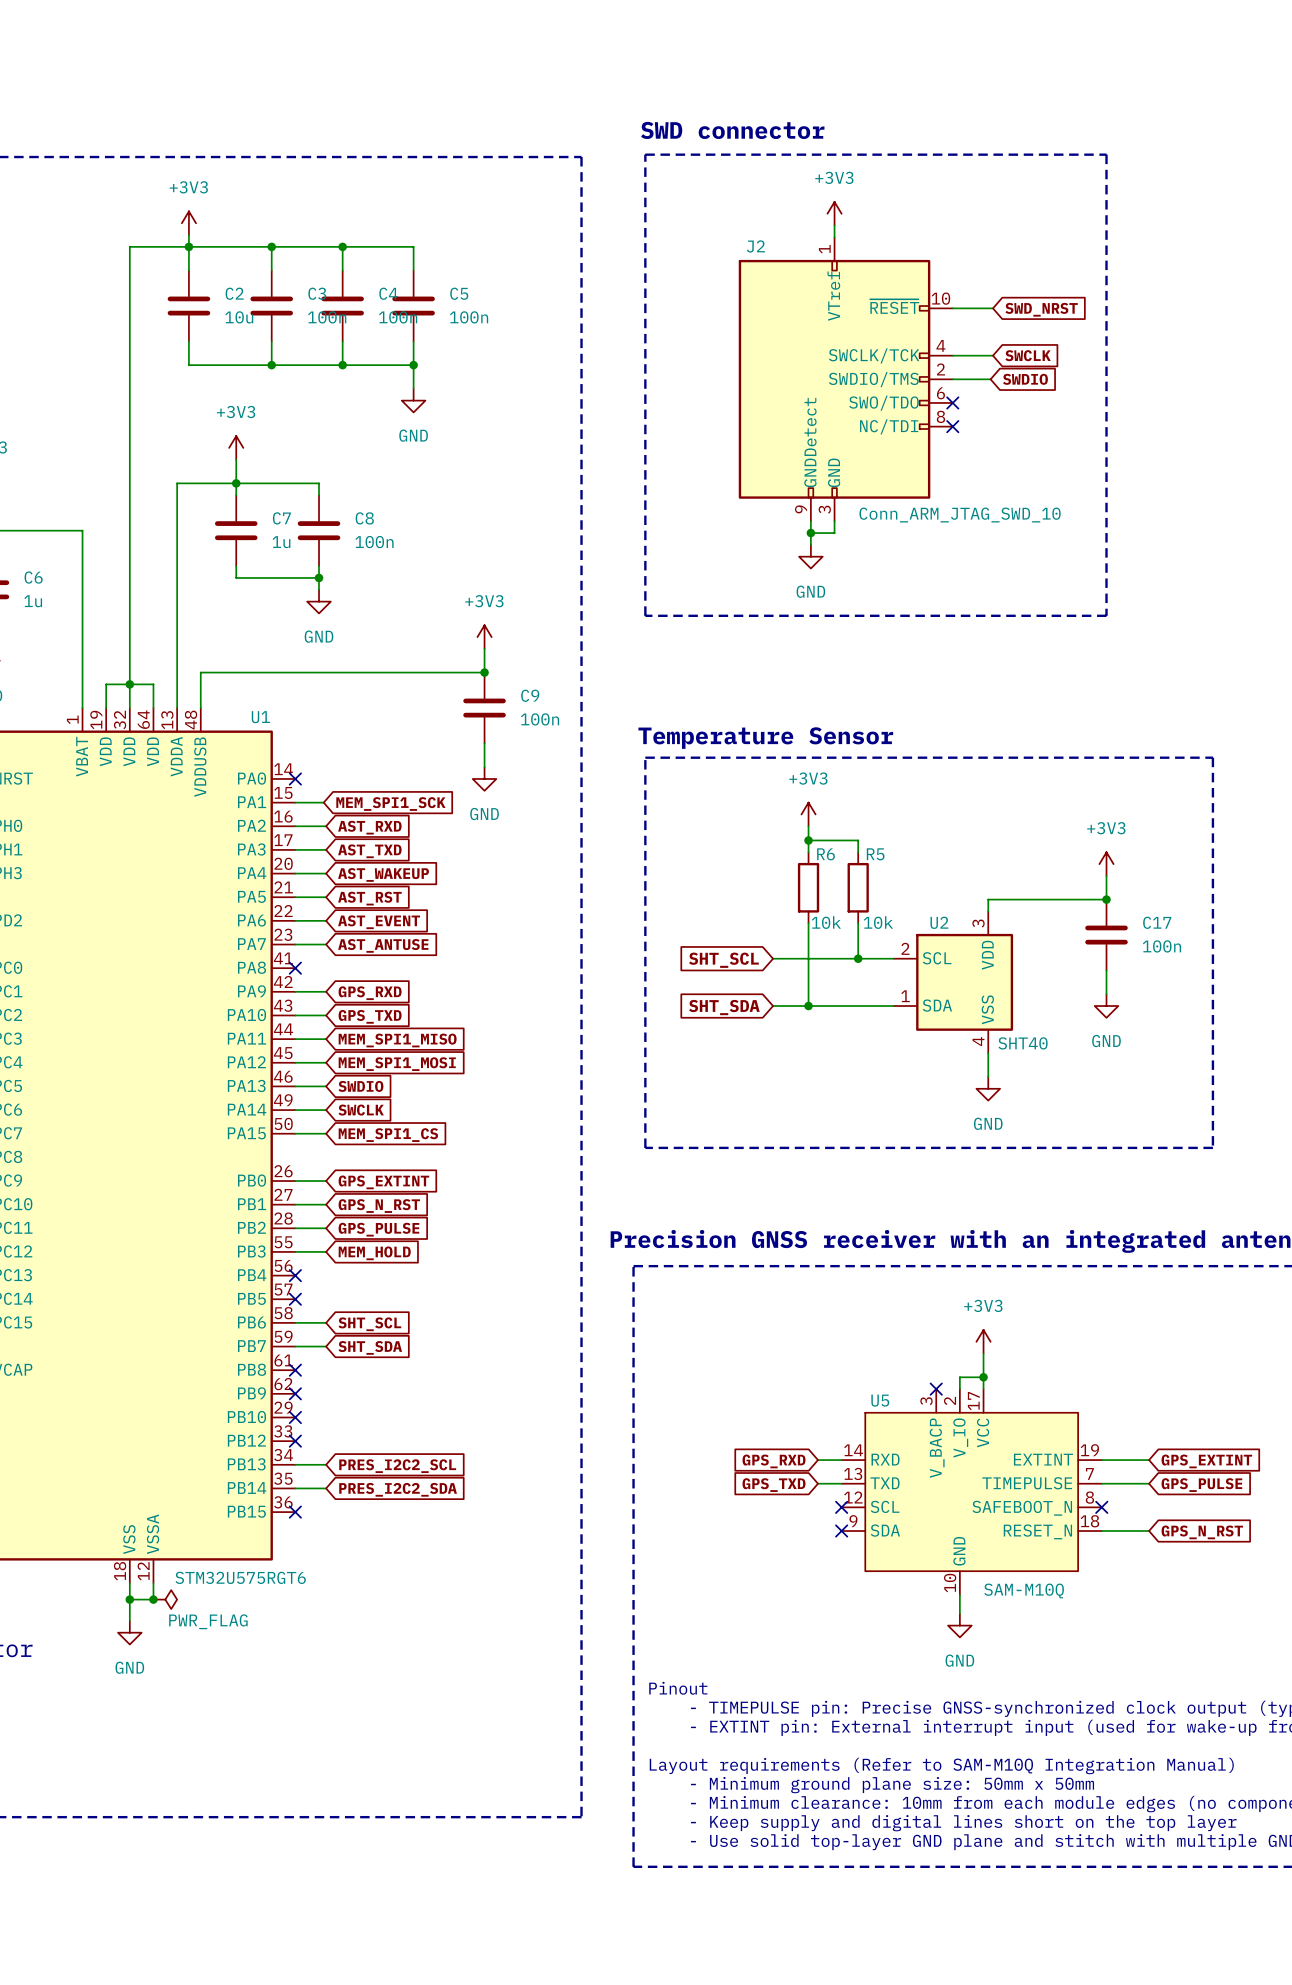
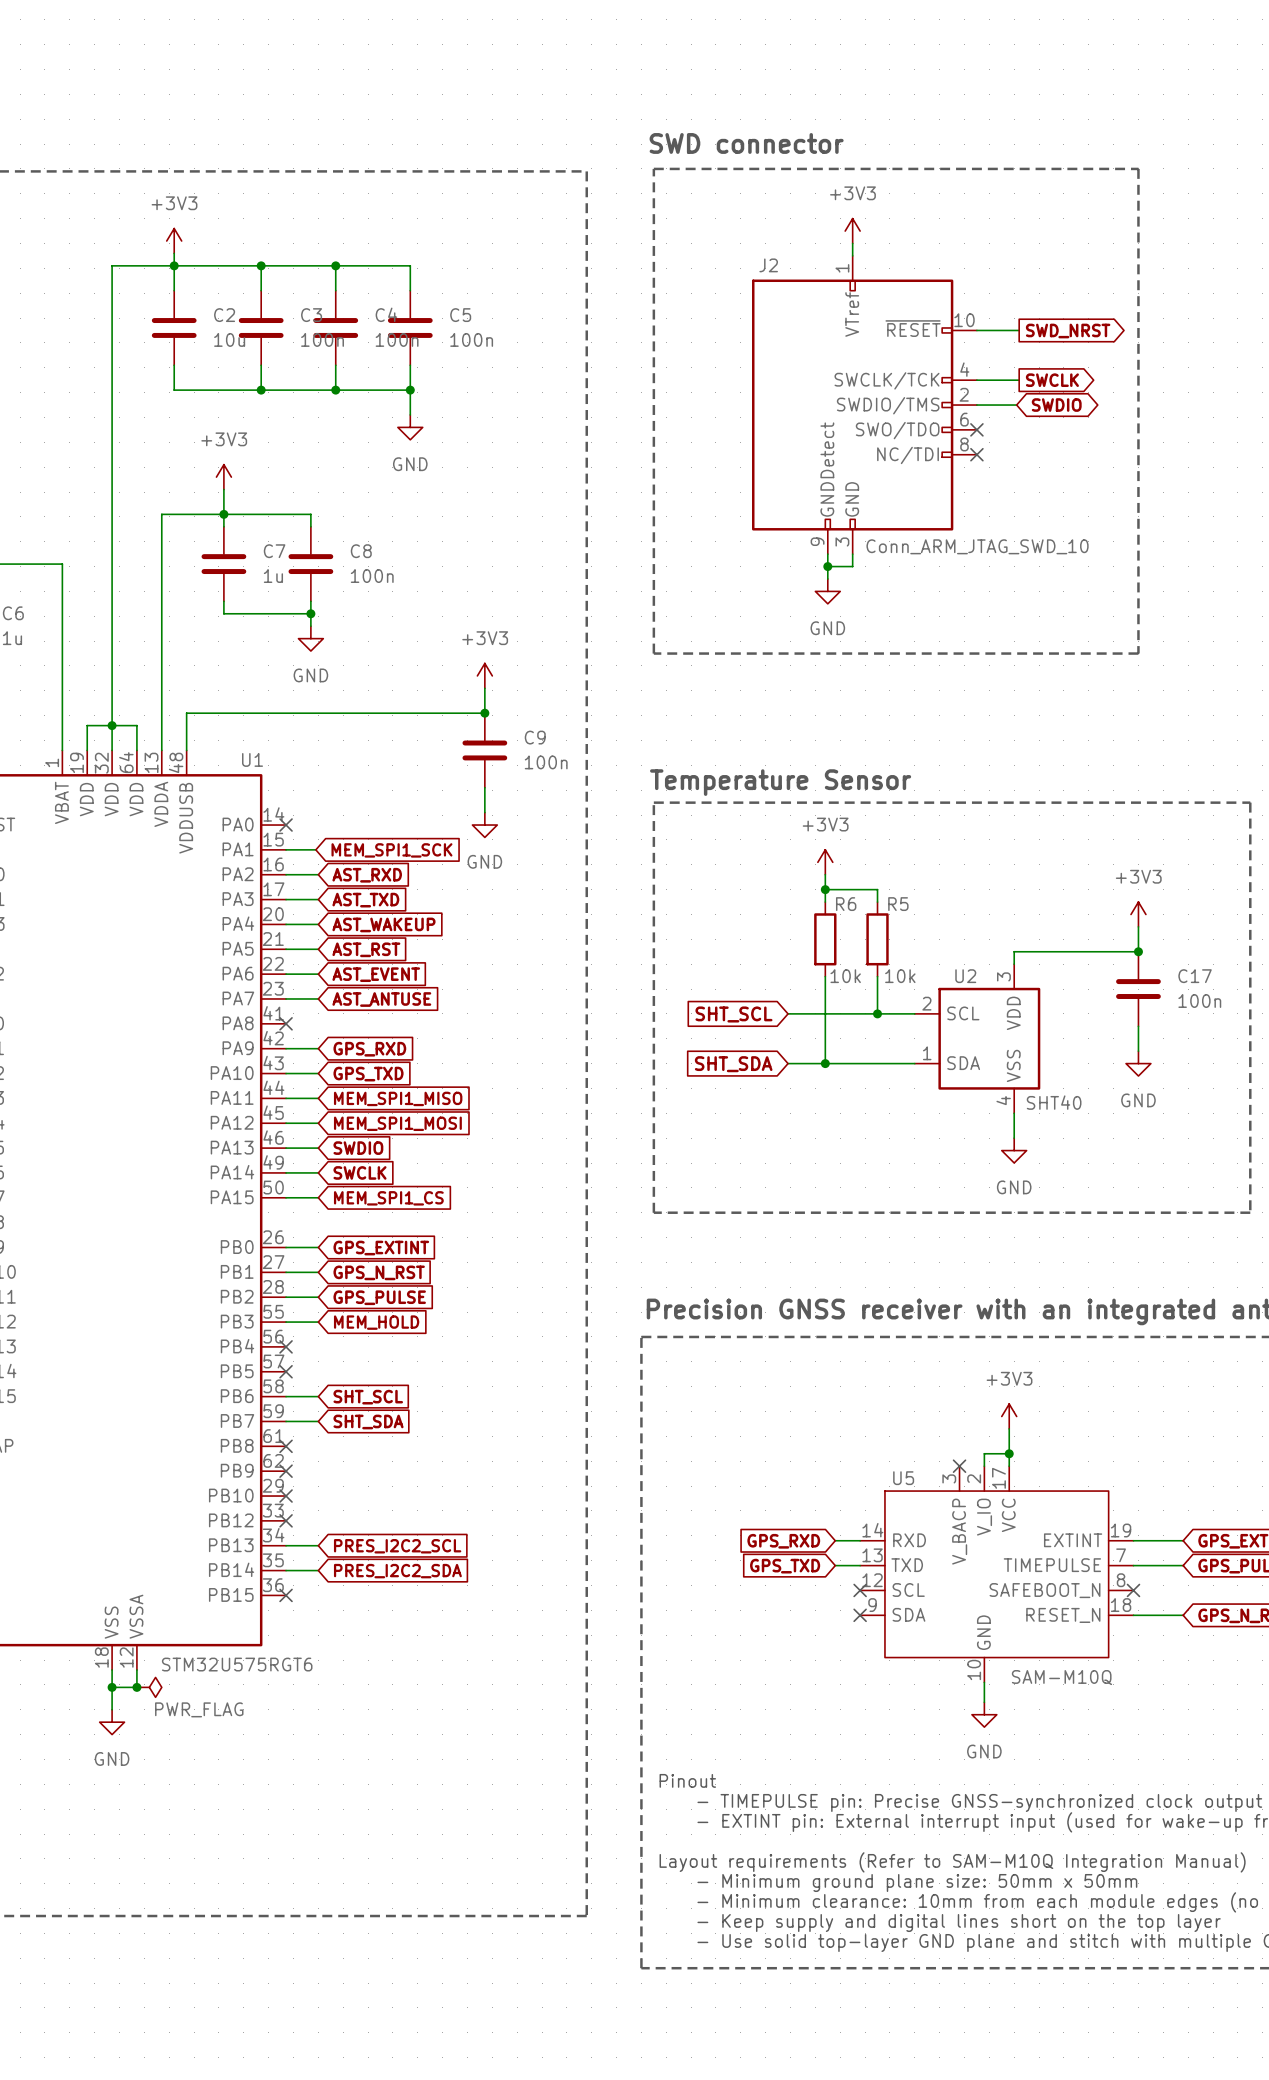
global label shape: input (1041, 309) -> output (1068, 331)
global label shape: input (1028, 355) -> output (1052, 380)
global label shape: input (1025, 379) -> bidirectional (1056, 405)

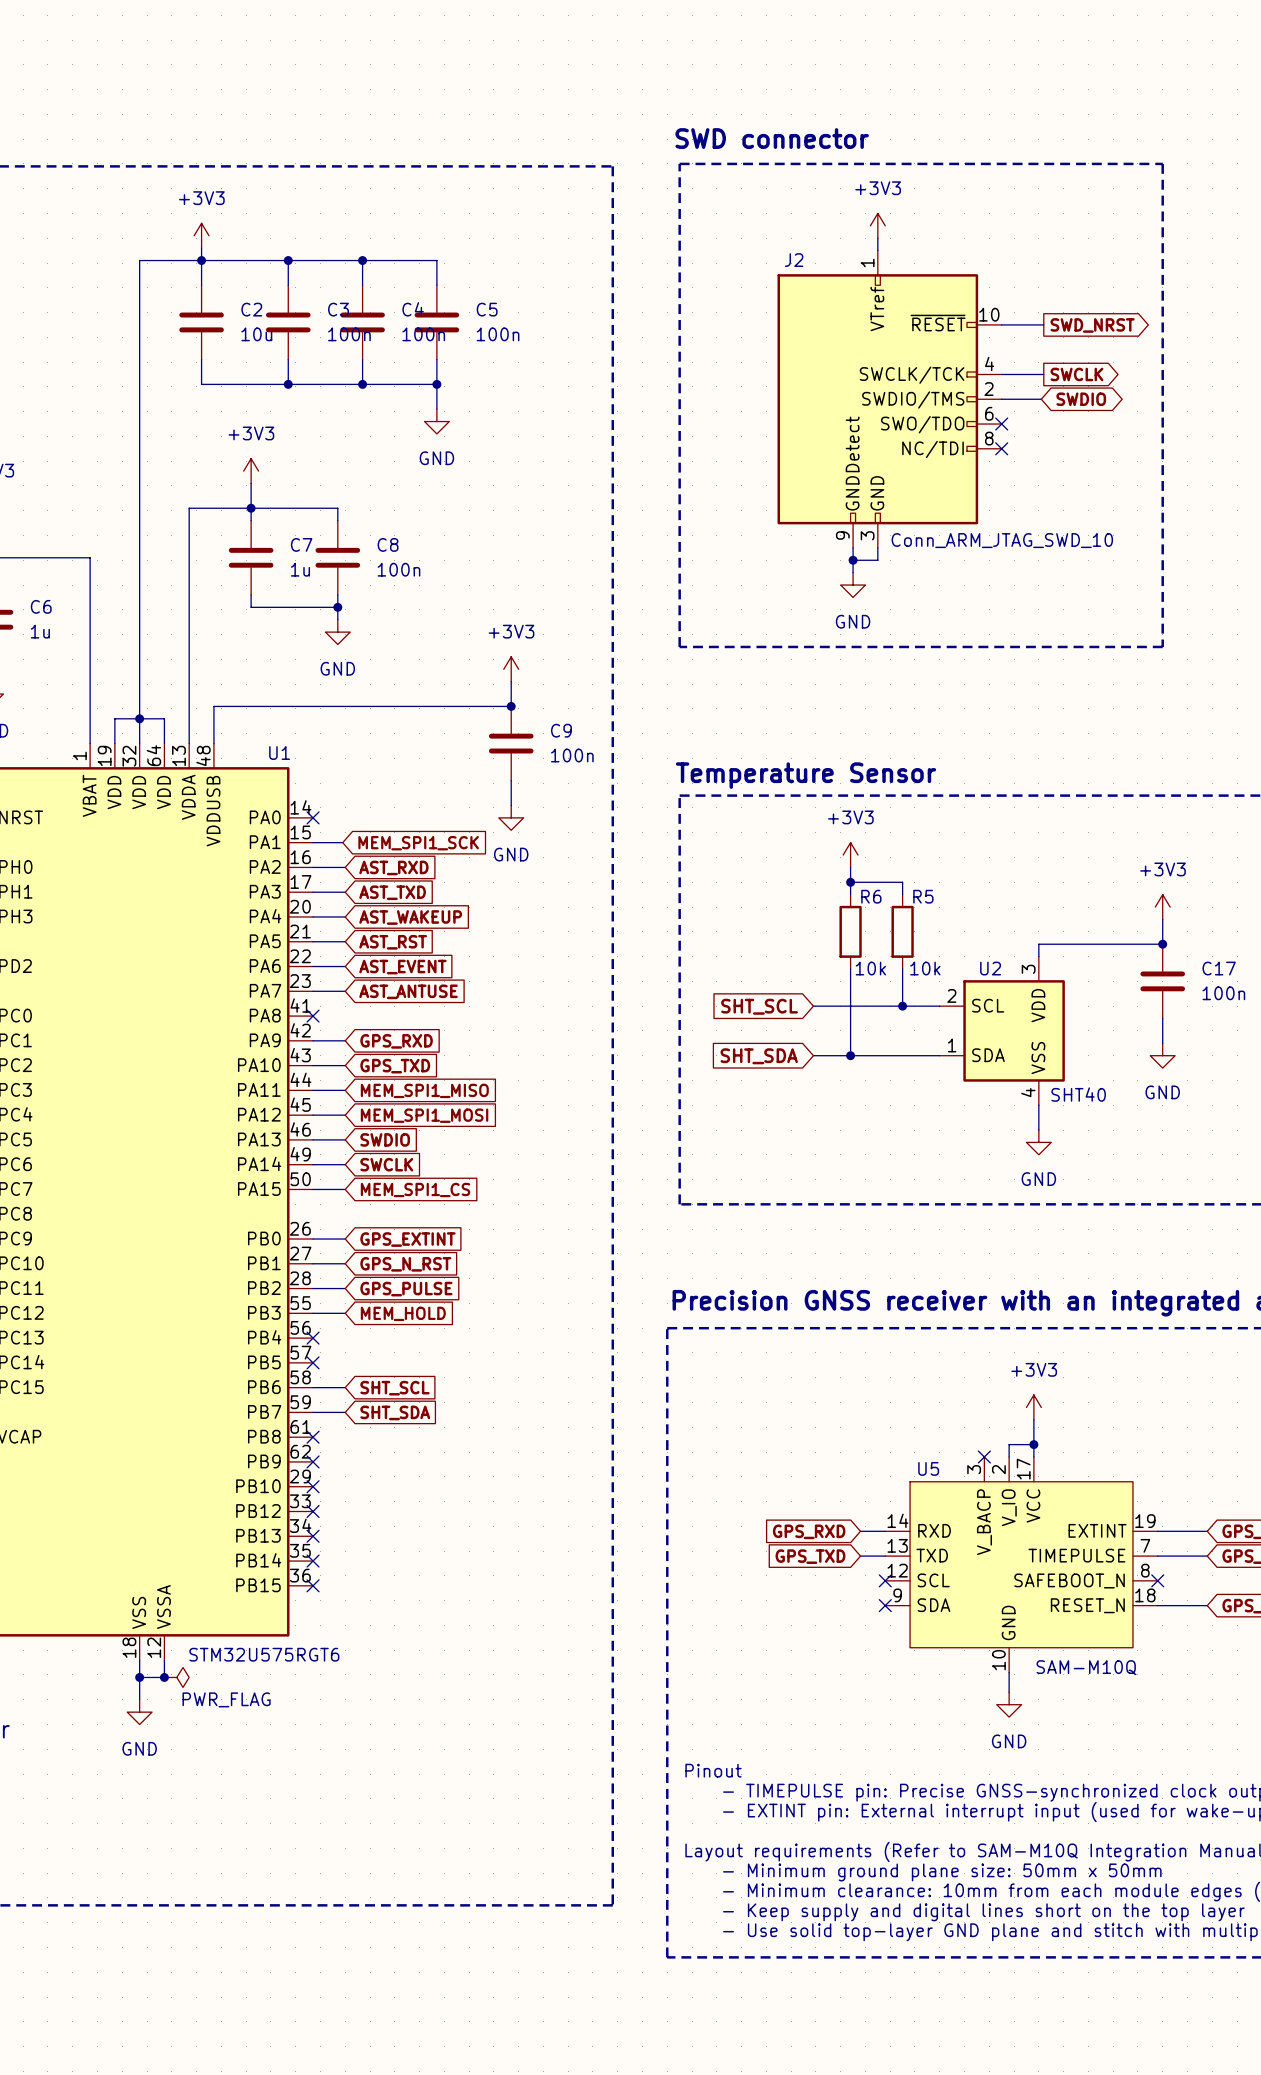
wire: (286, 1545) (318, 1545) -> none
no-connect mark: none -> (313, 1536)
global label: PRES_I2C2_SCL (397, 1546) -> none
wire: (286, 1570) (318, 1570) -> none
no-connect mark: none -> (313, 1561)
global label: PRES_I2C2_SDA (397, 1571) -> none

